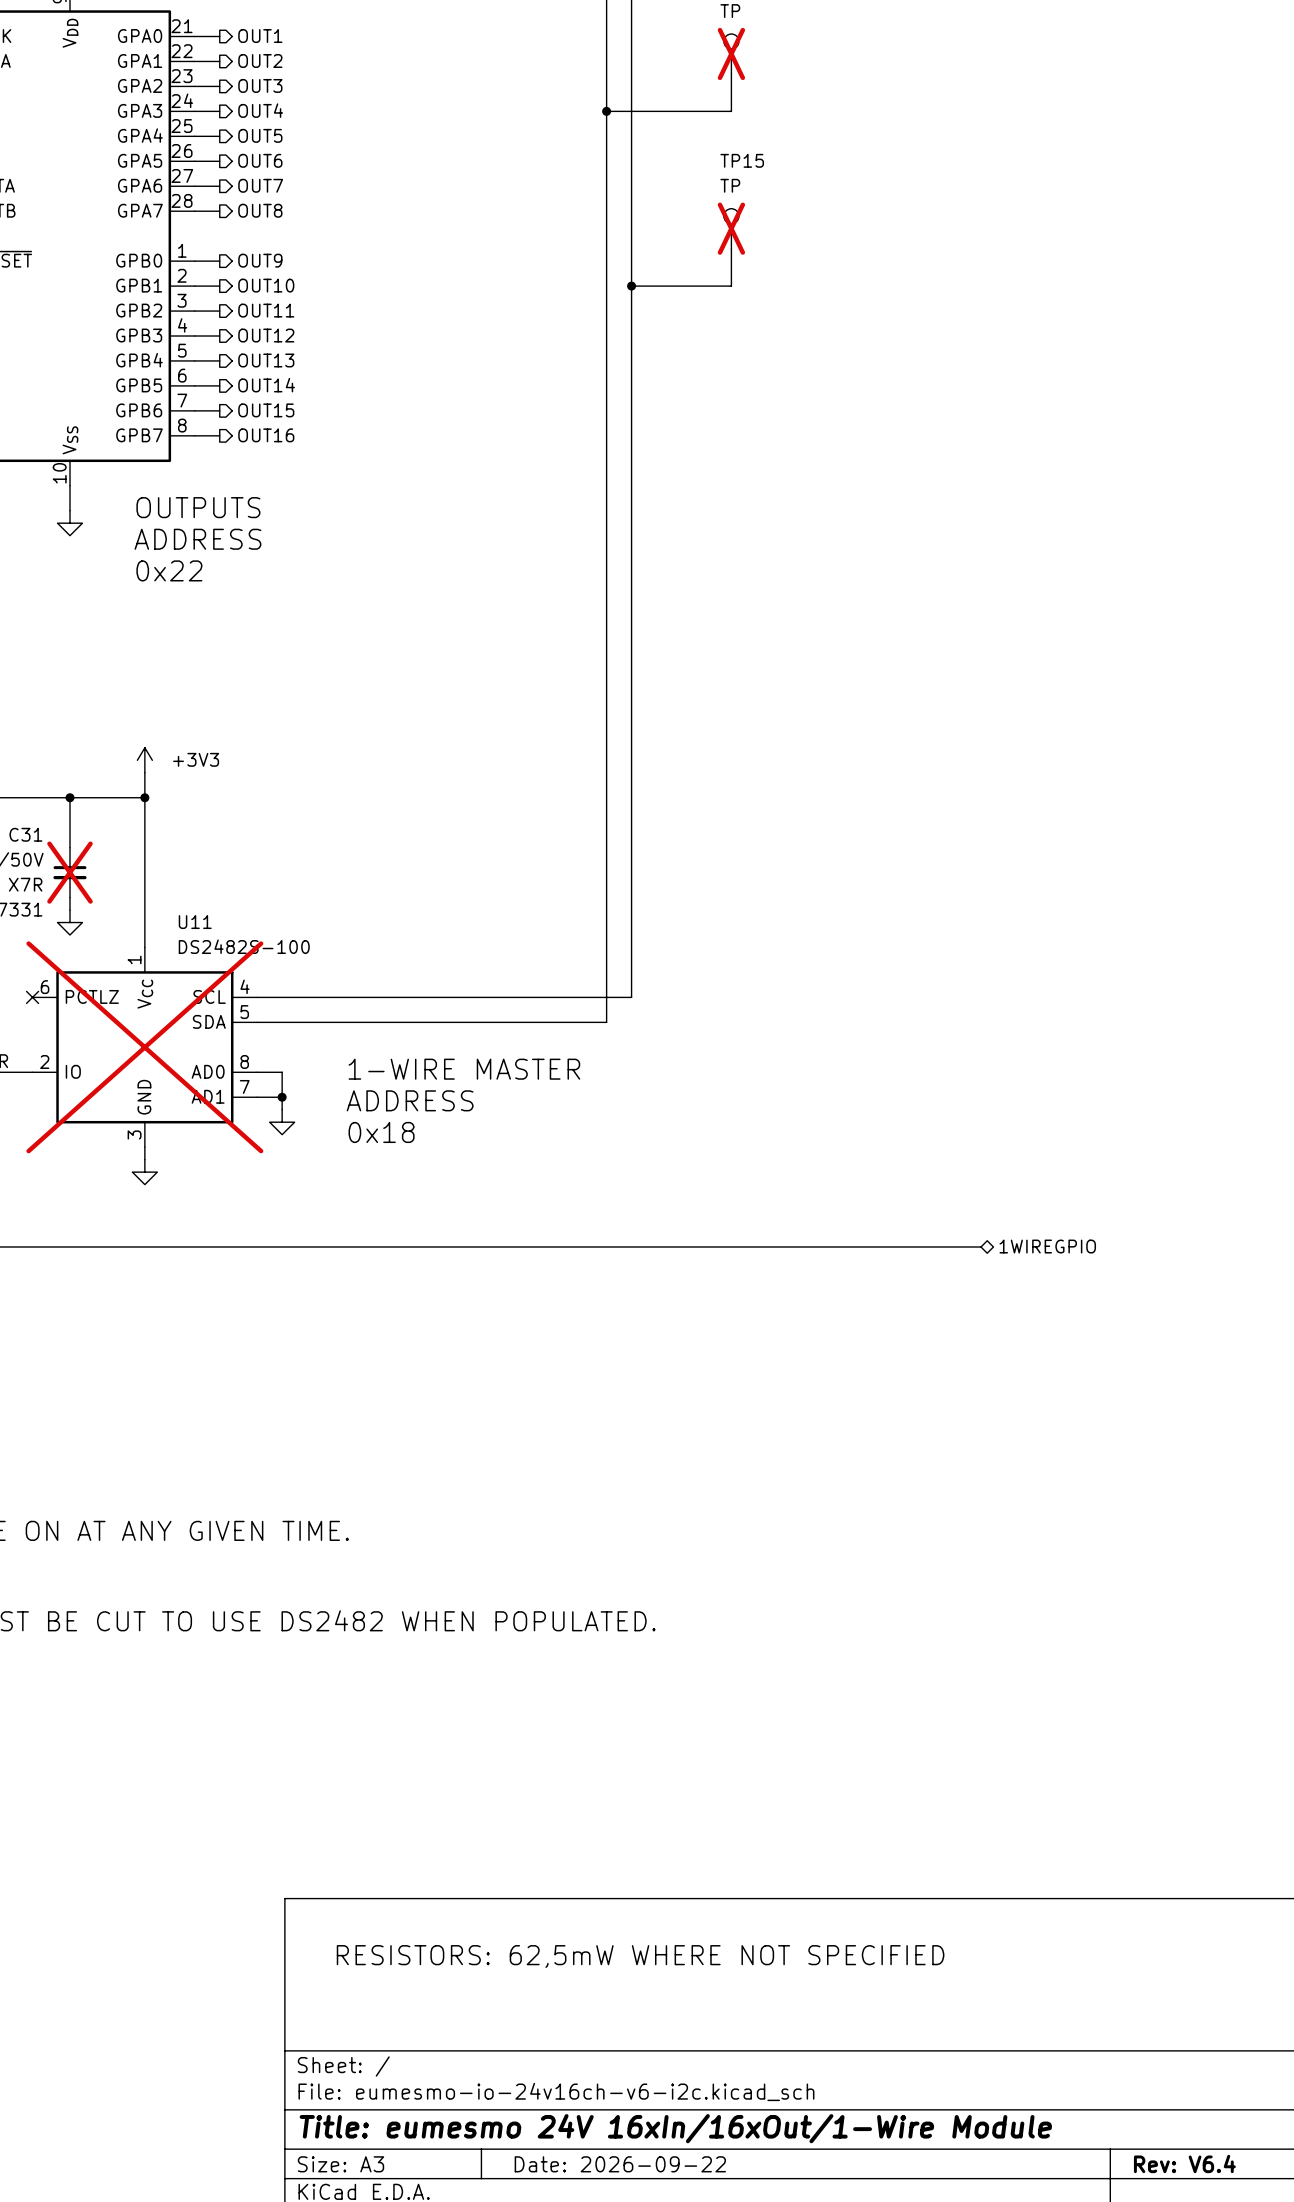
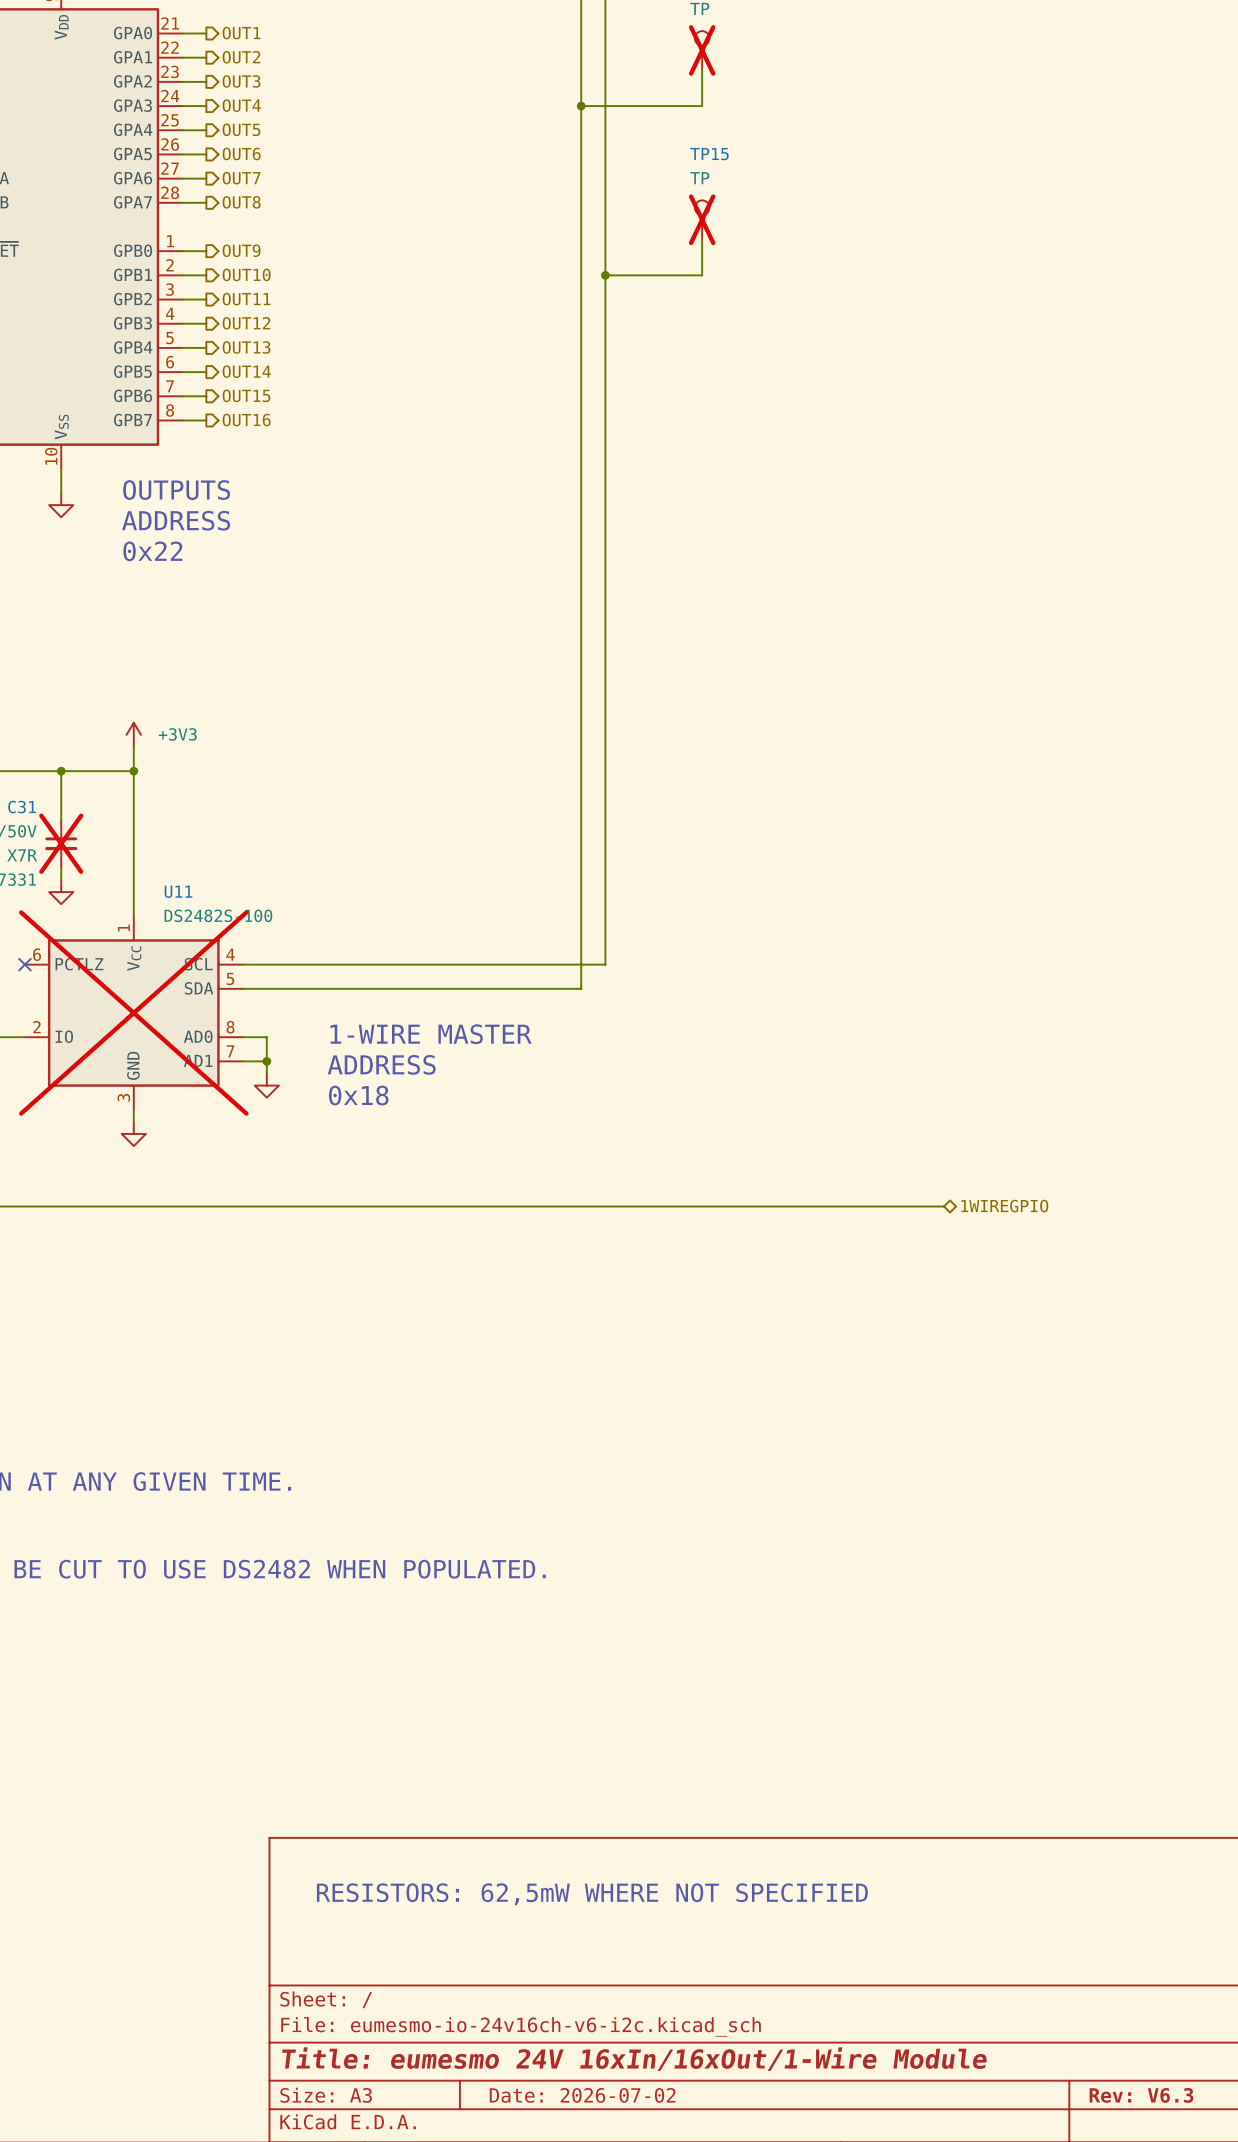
title block: Rev: V6.4 (1184, 2163) -> Rev: V6.3 (1141, 2095)
title block: Date: 2026-09-22 (620, 2164) -> Date: 2026-07-02 (582, 2095)

